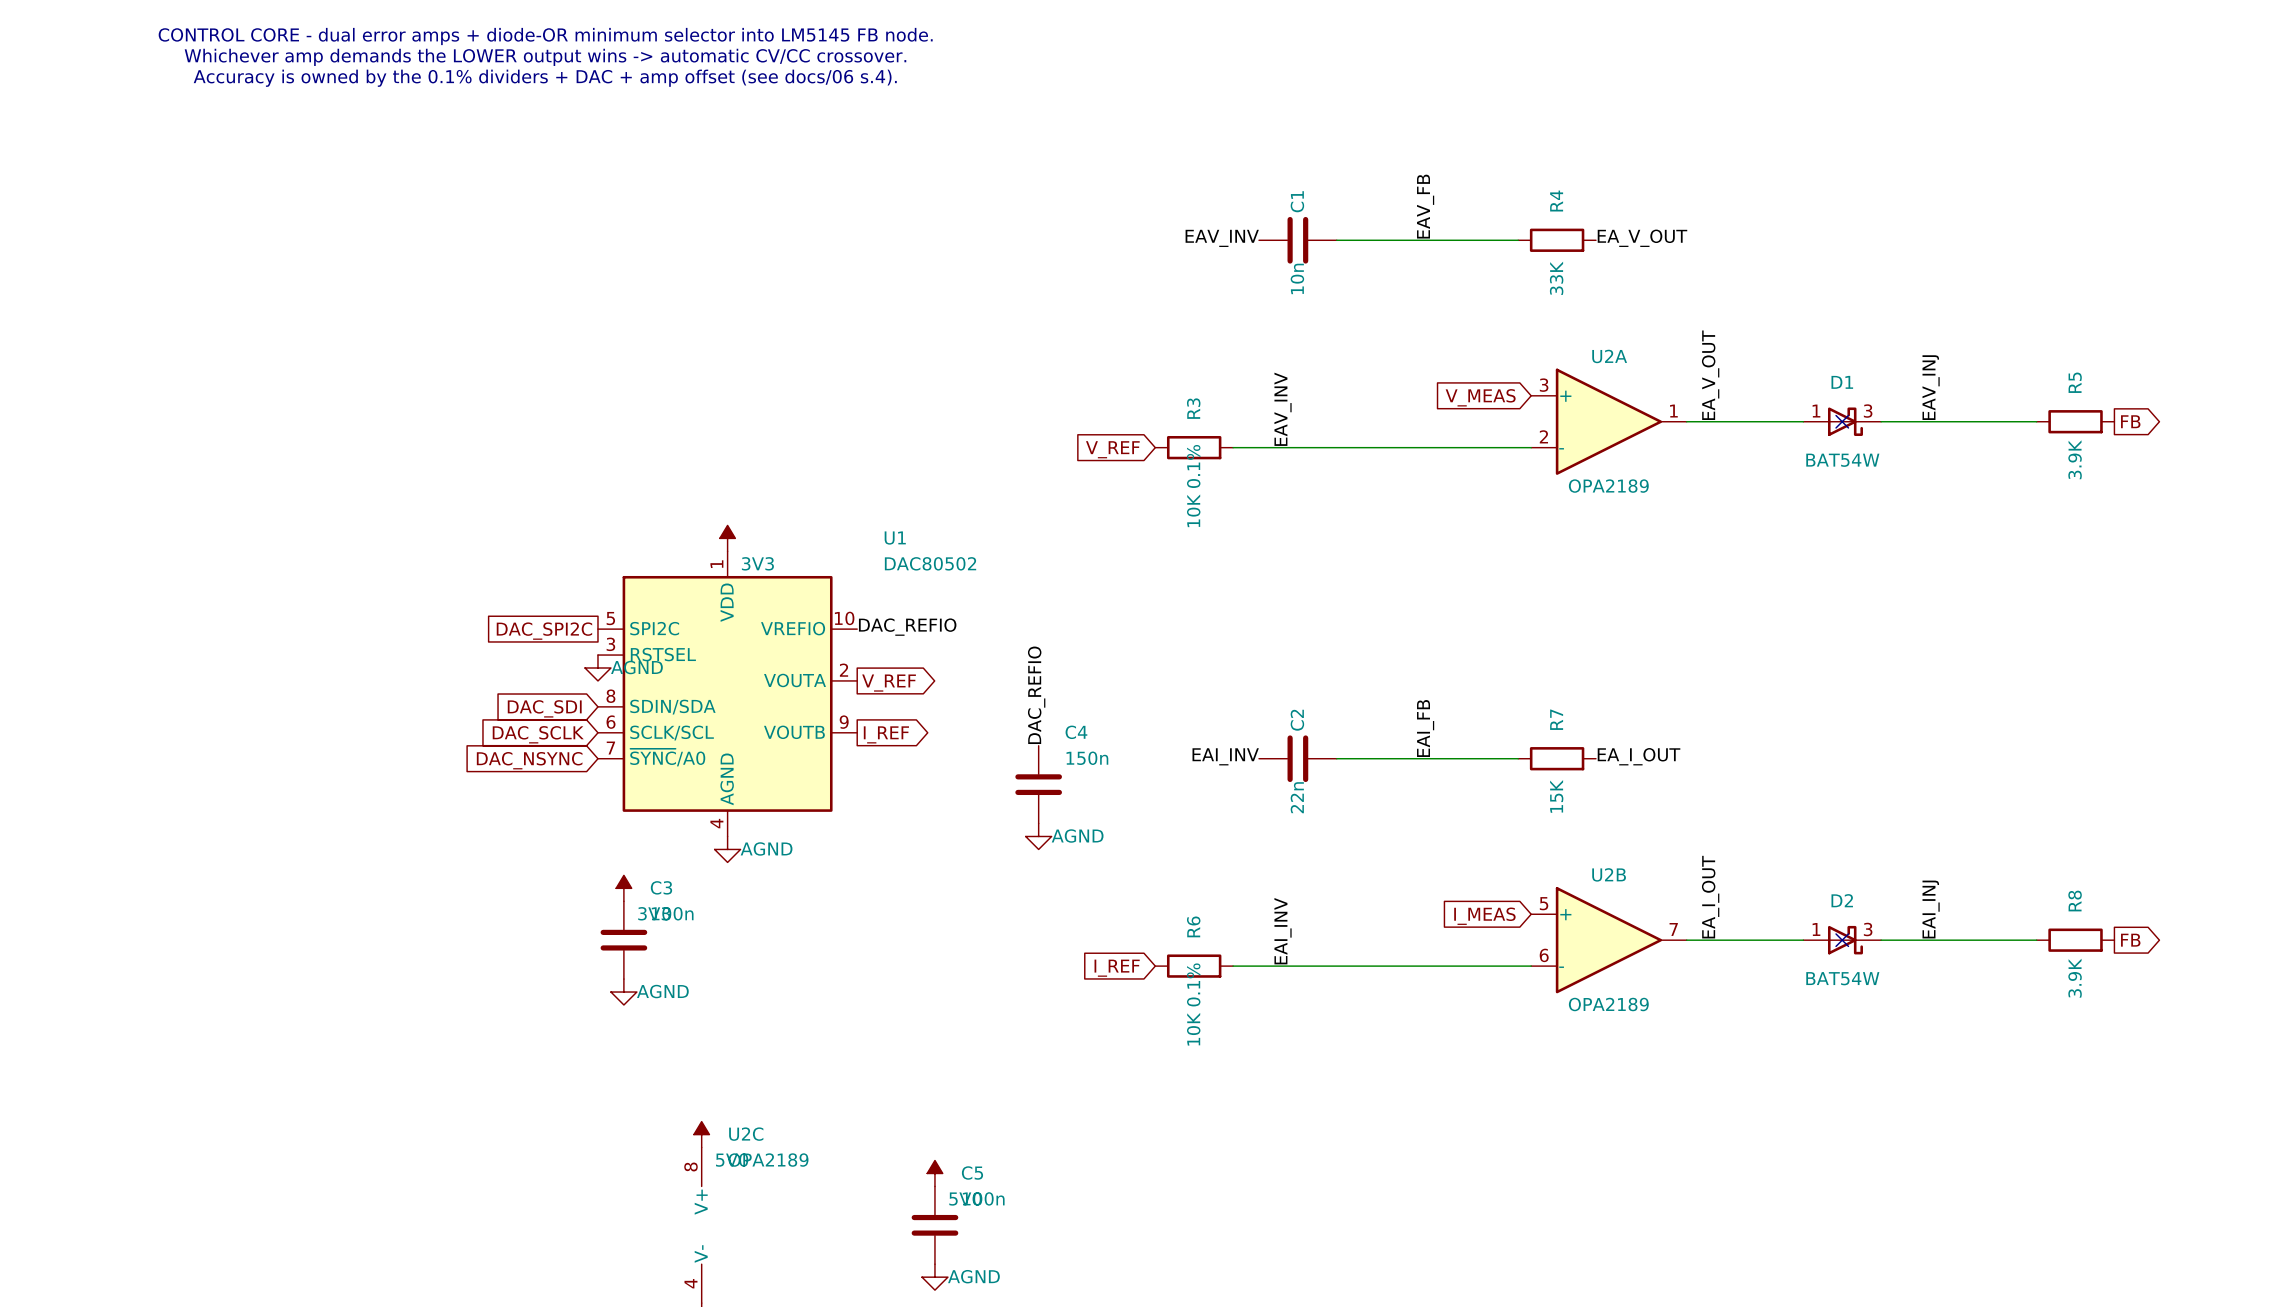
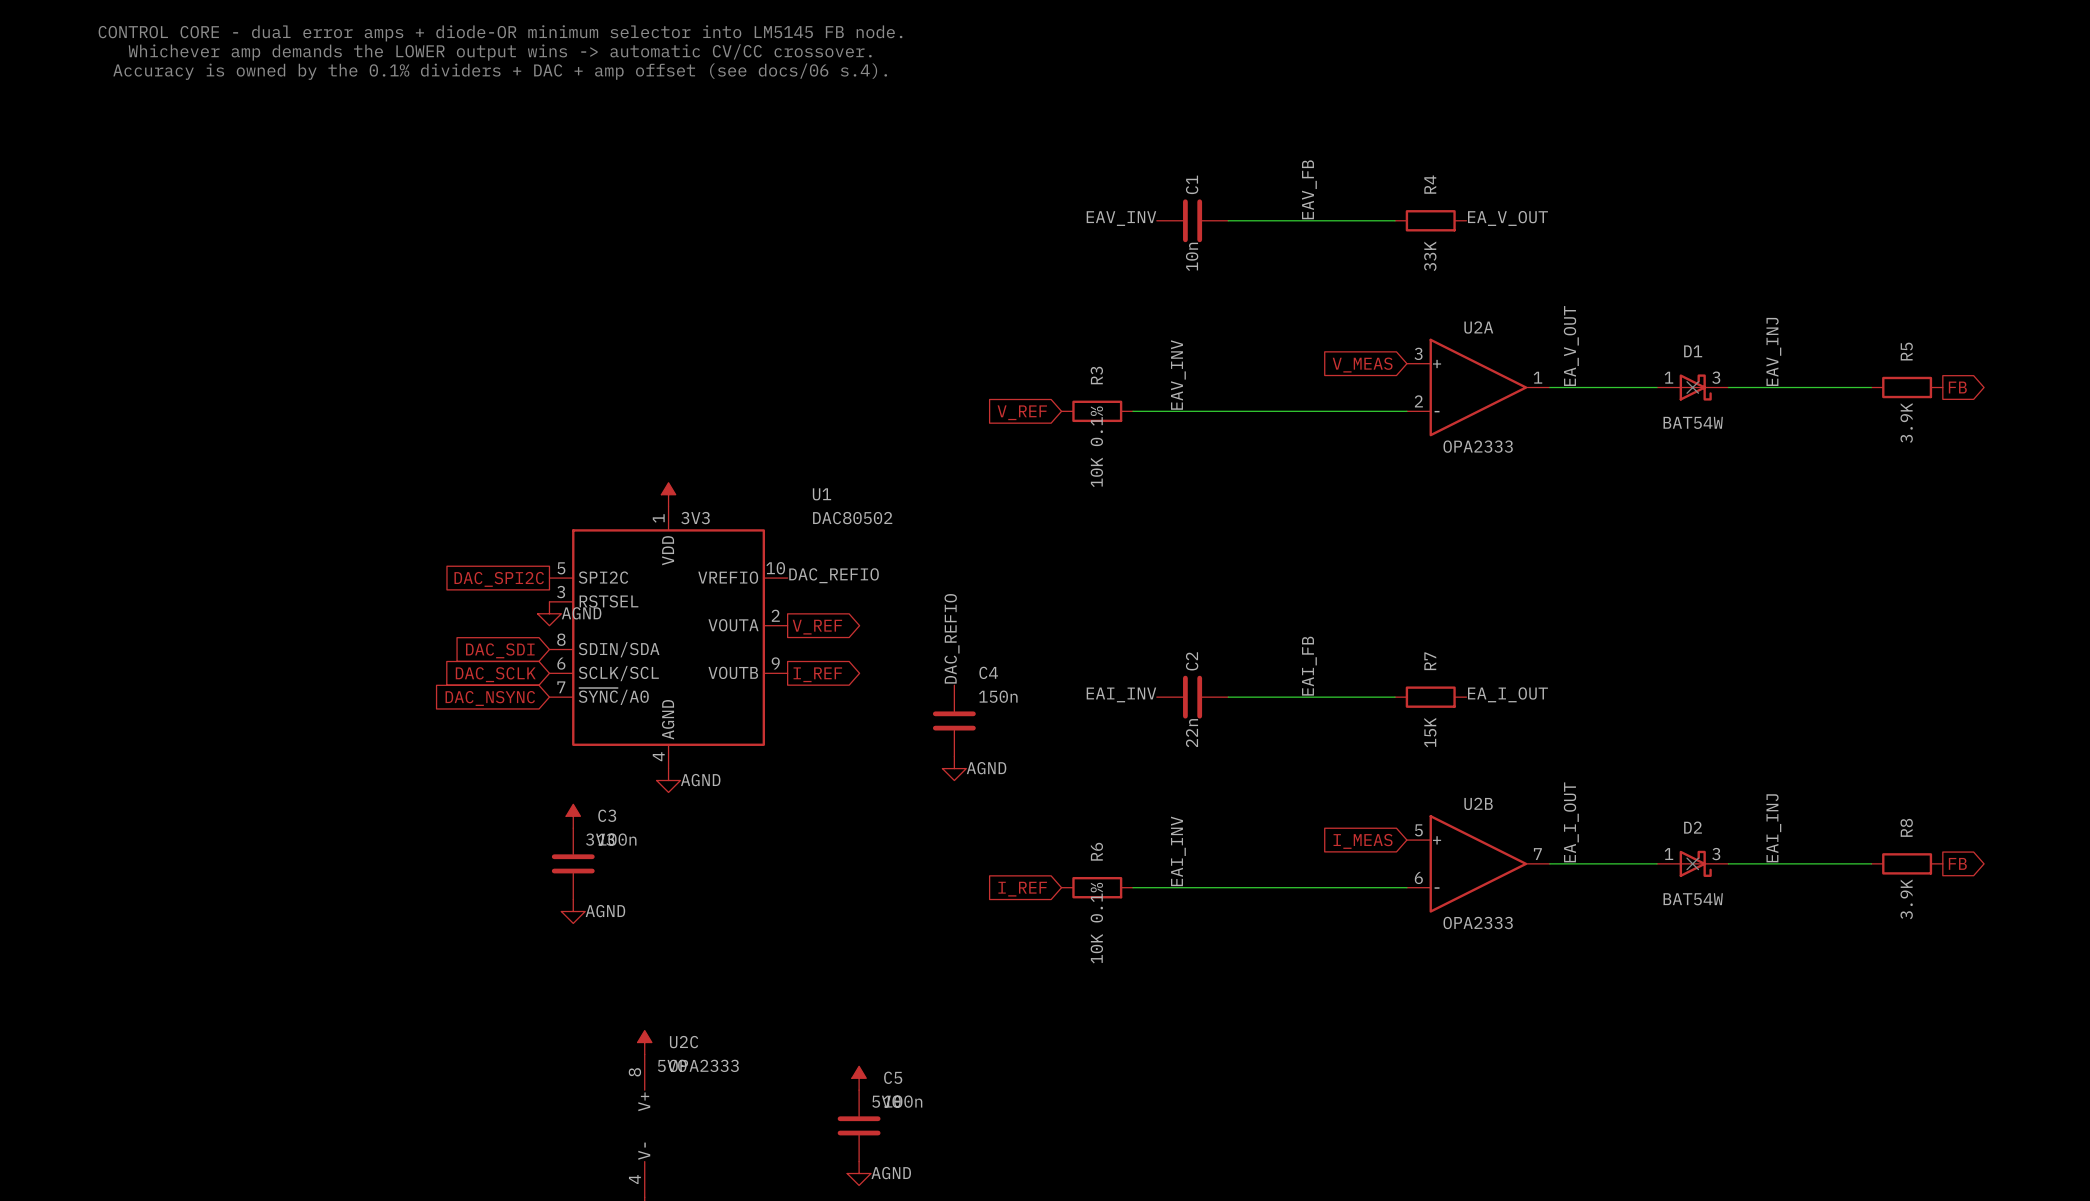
U2A value: OPA2189 (1608, 486) -> OPA2333 (1478, 446)
U2B value: OPA2189 (1608, 1004) -> OPA2333 (1478, 922)
U2C value: OPA2189 (768, 1160) -> OPA2333 (704, 1065)

